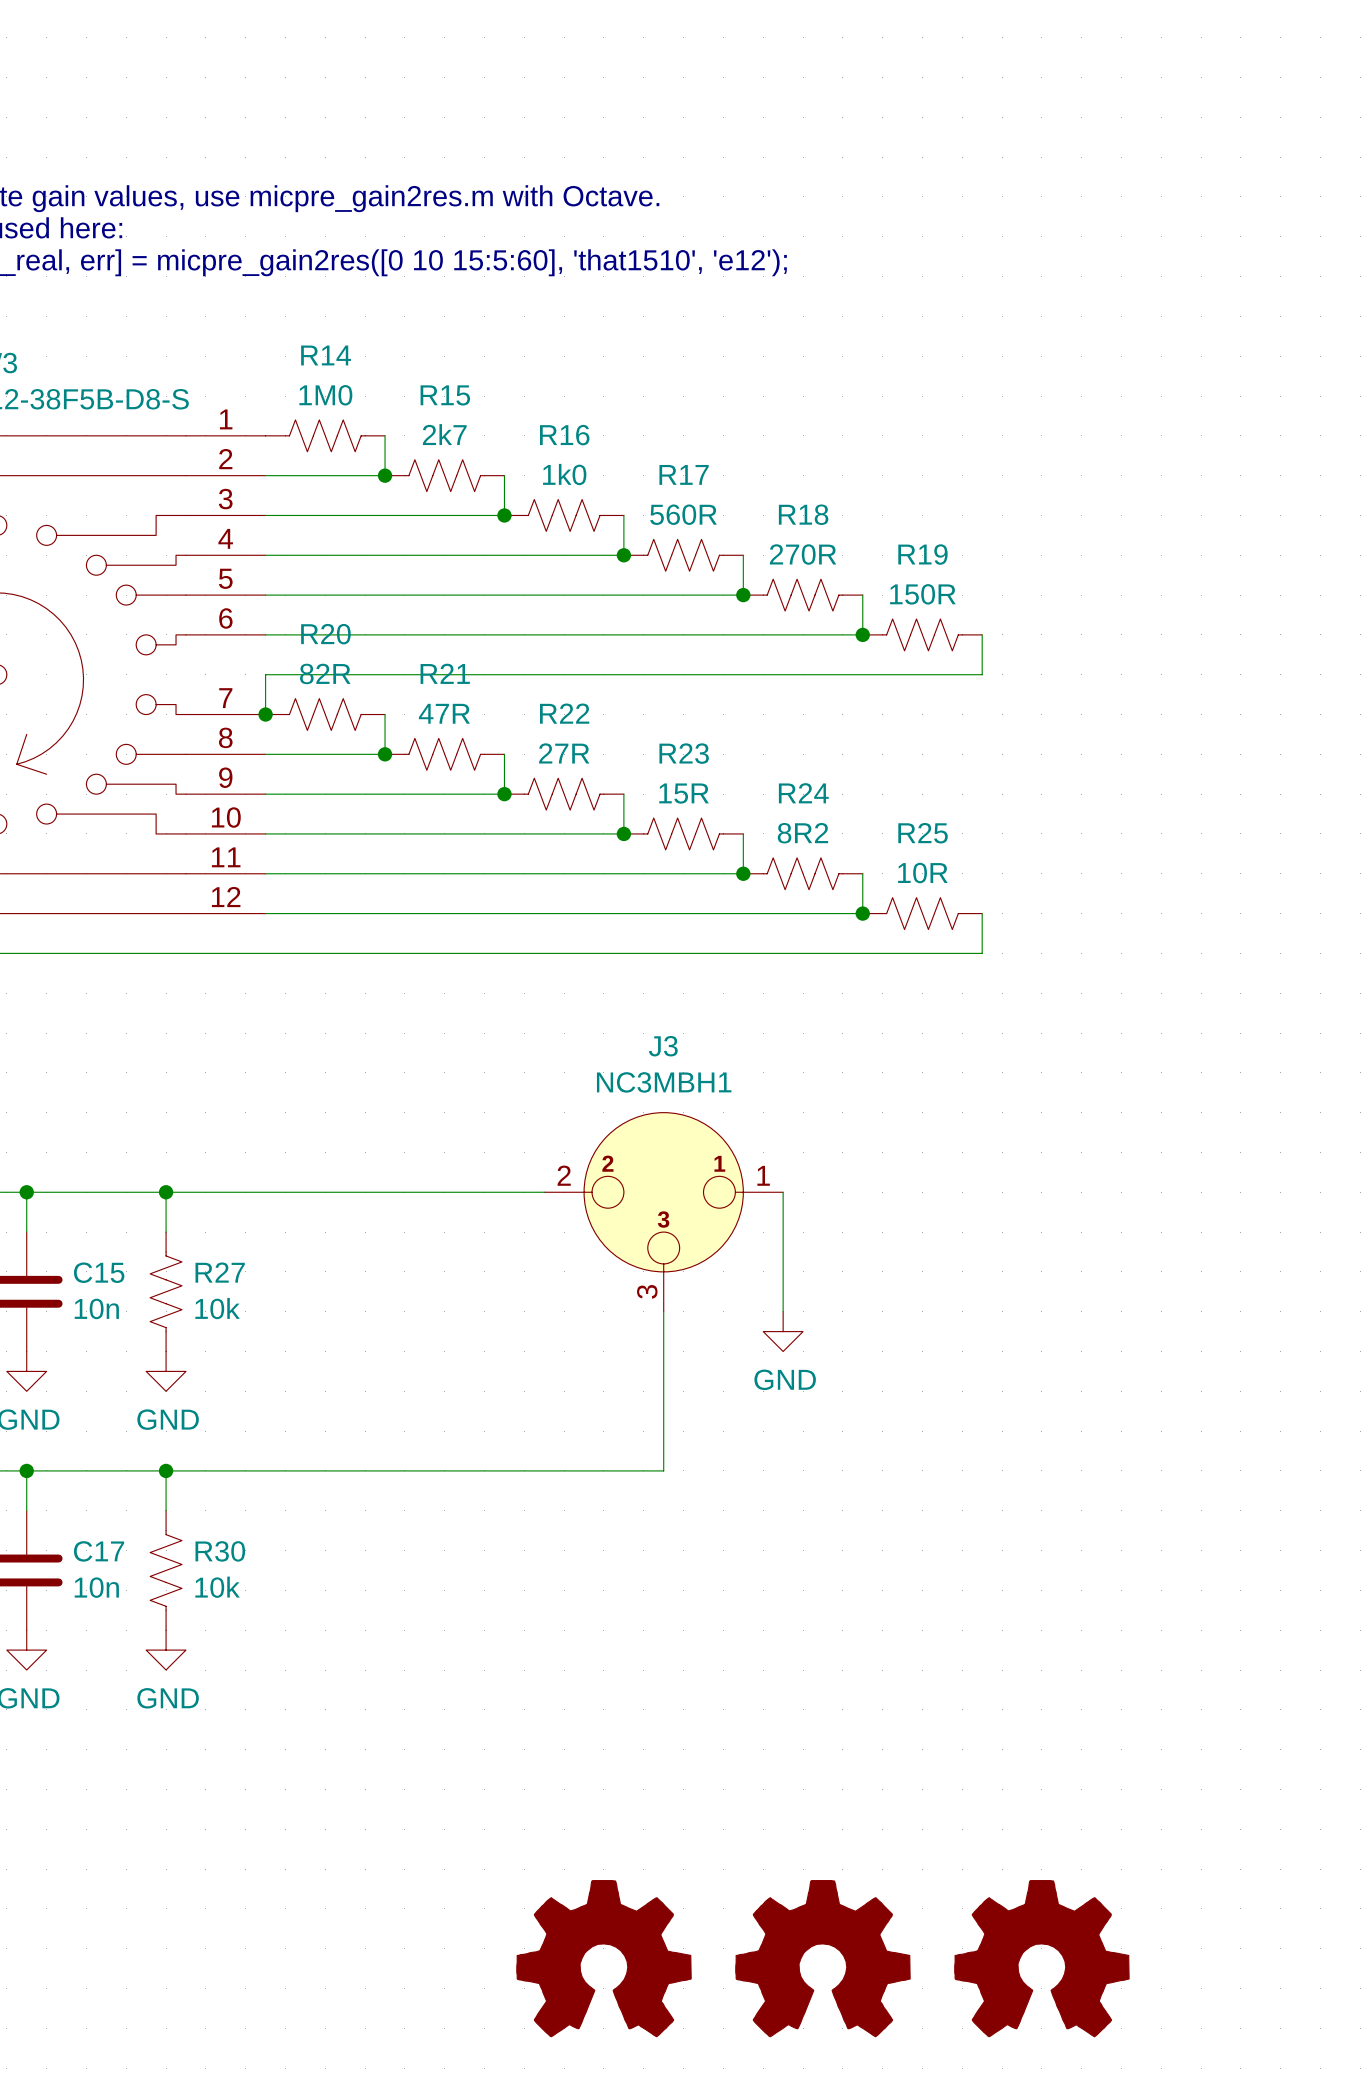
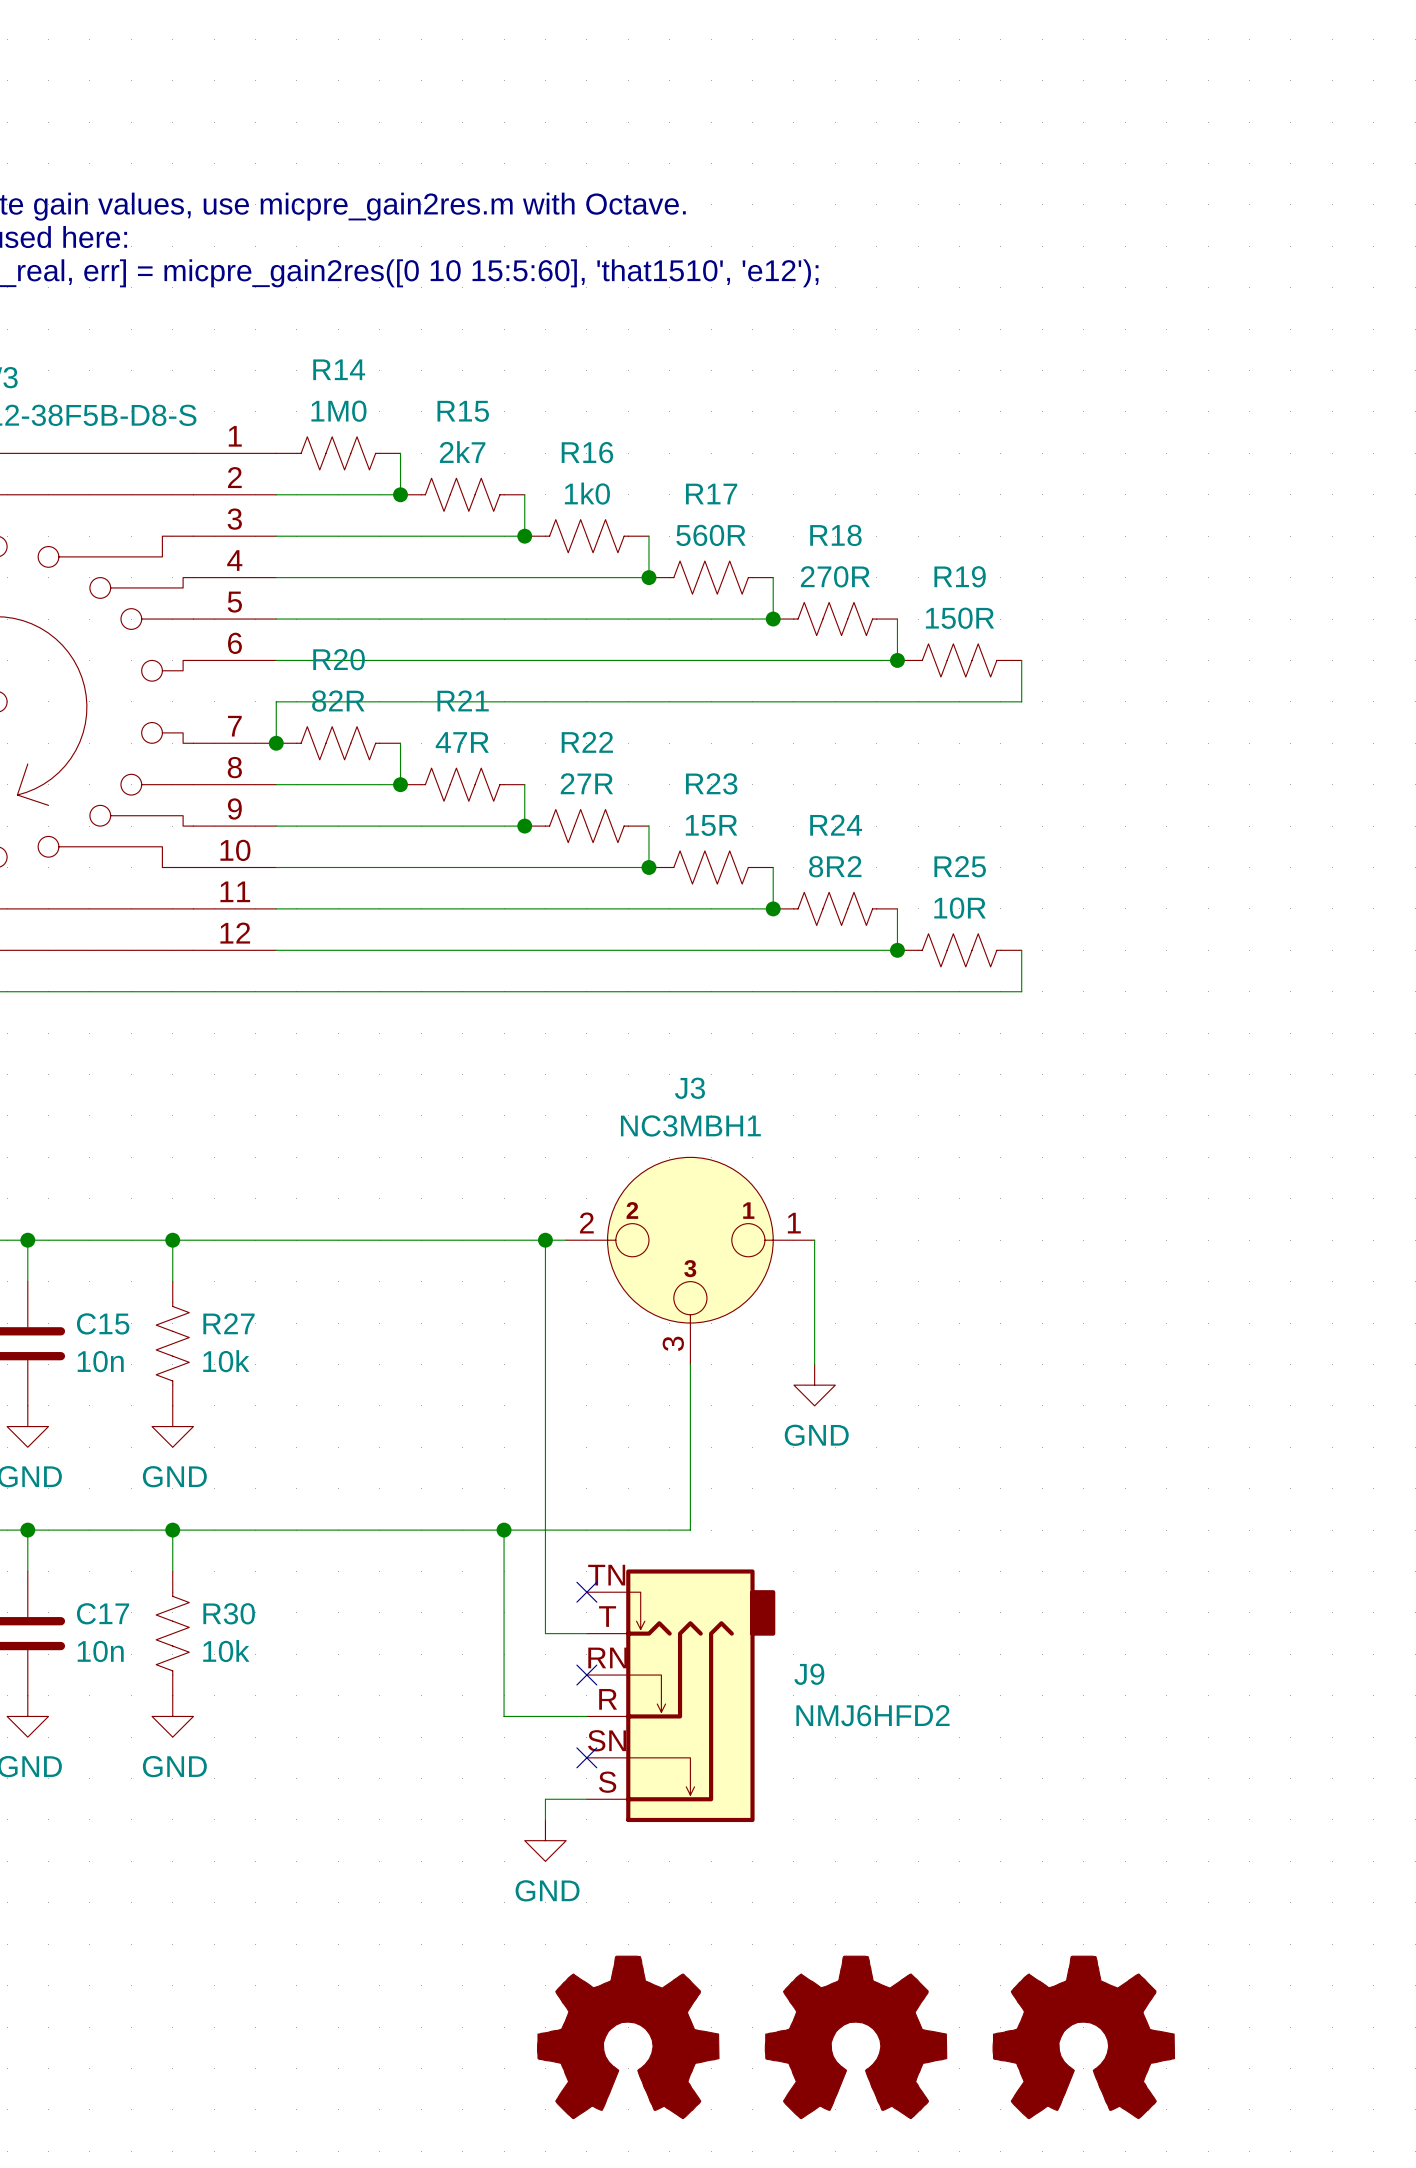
wire: none -> (545, 1240) (545, 1633) (586, 1633)
junction: none -> (545, 1240)
wire: none -> (504, 1530) (504, 1716) (586, 1716)
junction: none -> (504, 1530)
no-connect mark: none -> (586, 1592)
no-connect mark: none -> (586, 1675)
J9: none -> NMJ6HFD2 (681, 1695)
no-connect mark: none -> (586, 1757)
wire: none -> (586, 1799) (545, 1799) (545, 1819)
power symbol: none -> GND (545, 1840)

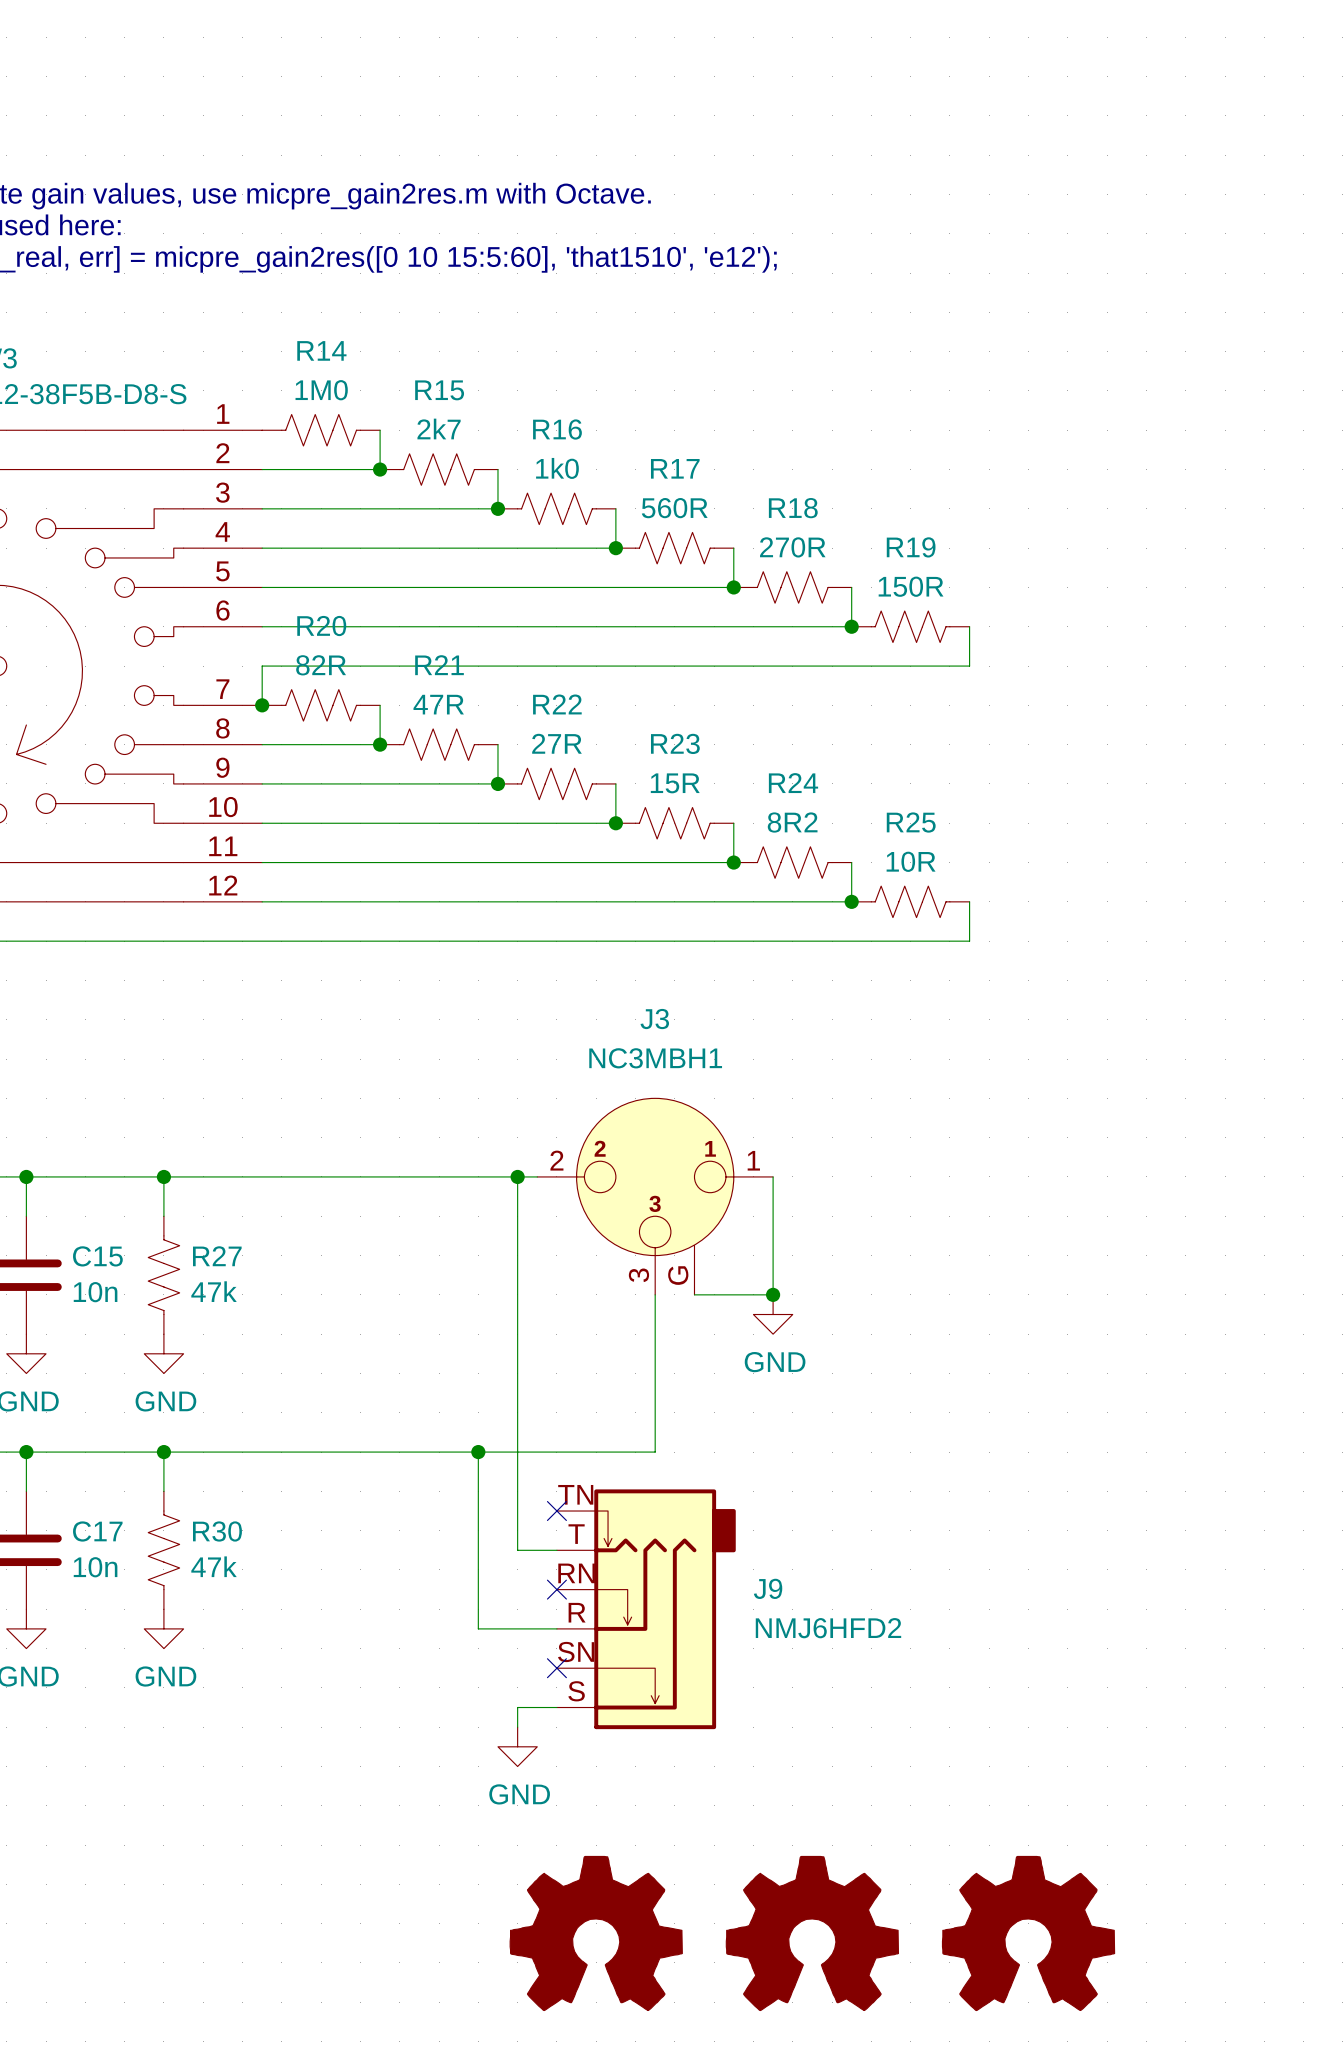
J3 symbol: [566, 1157, 815, 1365] -> [537, 1098, 774, 1295]
R27 value: 10k (226, 1361) -> 47k (214, 1291)
wire: none -> (694, 1294) (773, 1294)
junction: none -> (773, 1294)
R30 value: 10k (226, 1651) -> 47k (214, 1566)

